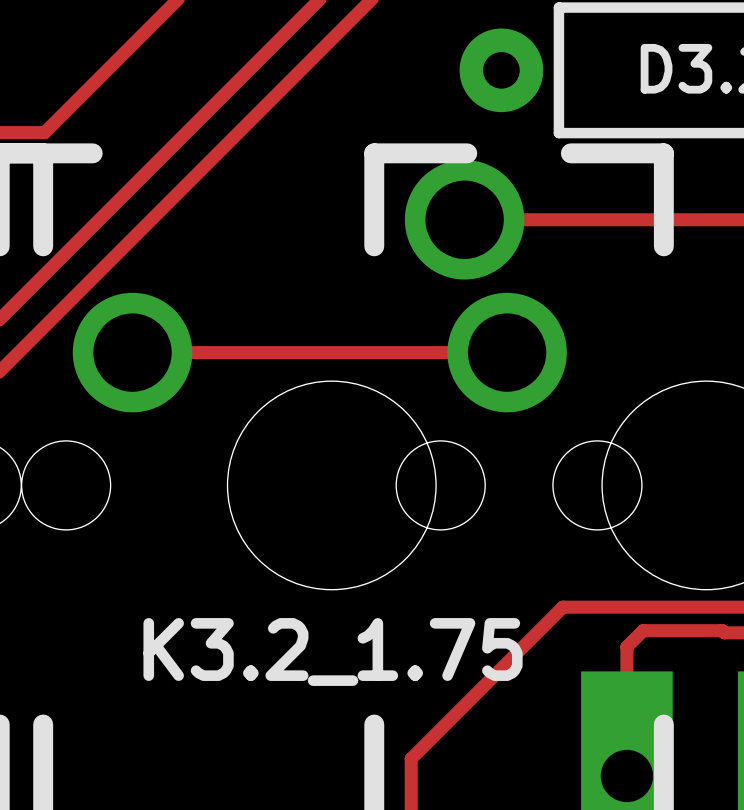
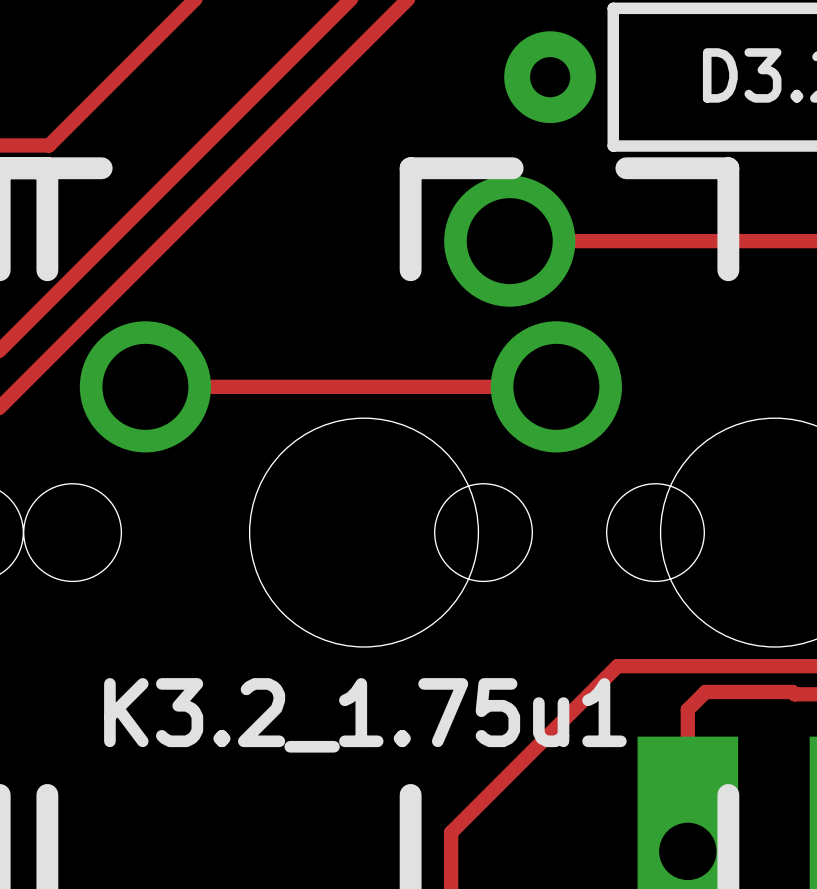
K3.2_1.75 name: K3.2_1.75 (333, 651) -> K3.2_1.75u1 (365, 715)

